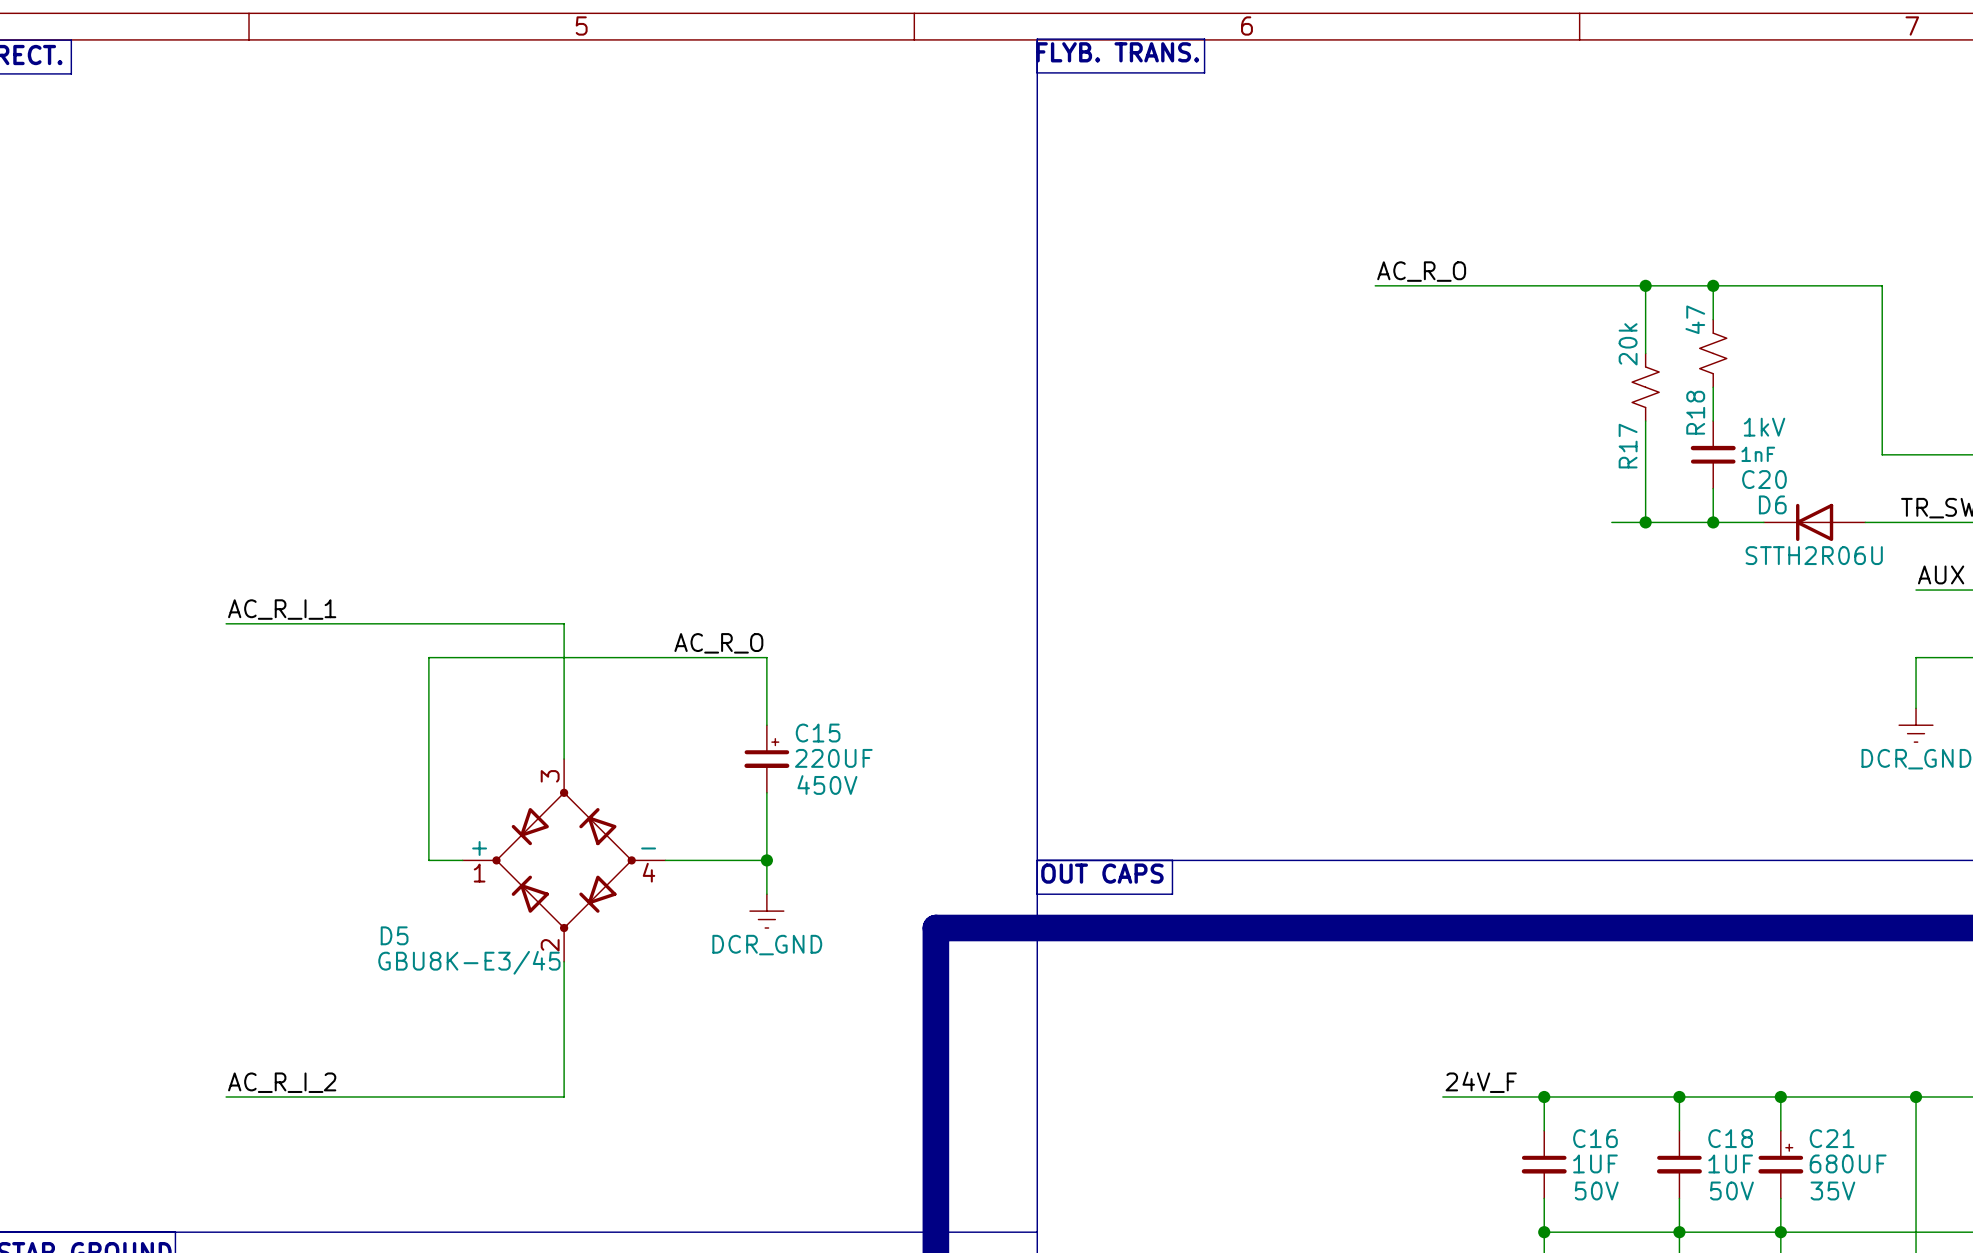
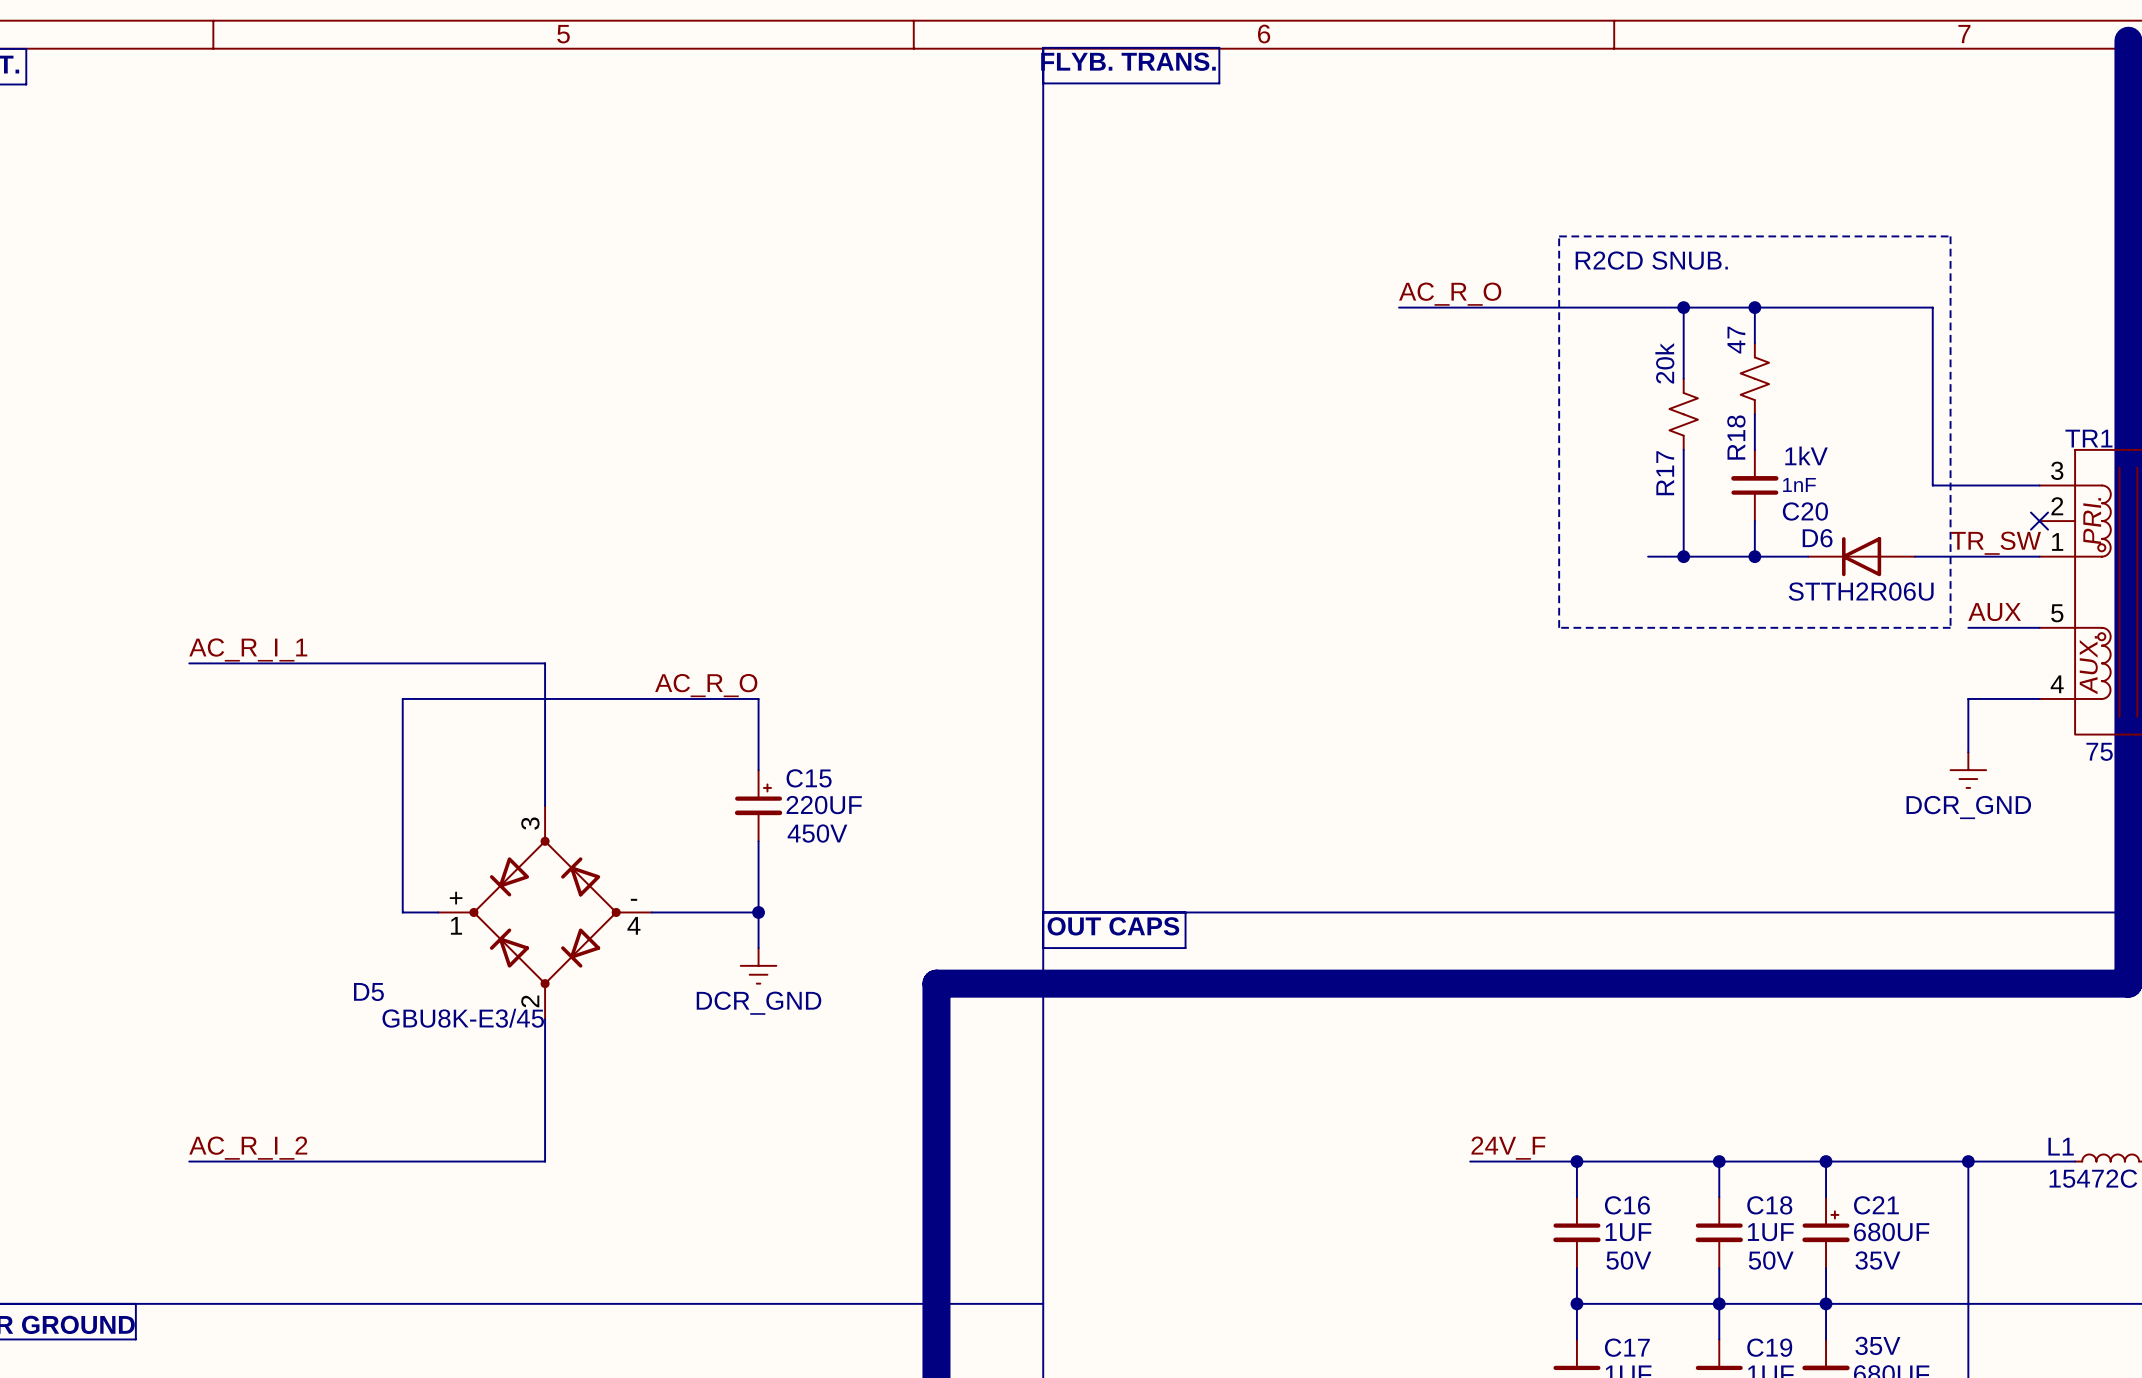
line: none -> (1559, 236) (1950, 236) (1950, 627) (1559, 627) (1559, 236)
text: none -> R2CD SNUB. (1651, 260)

